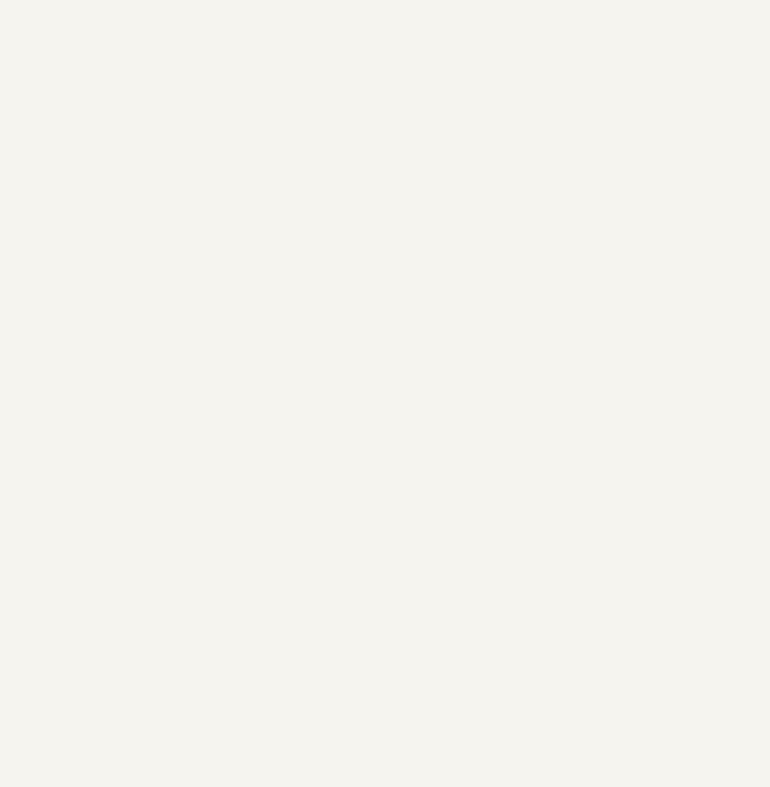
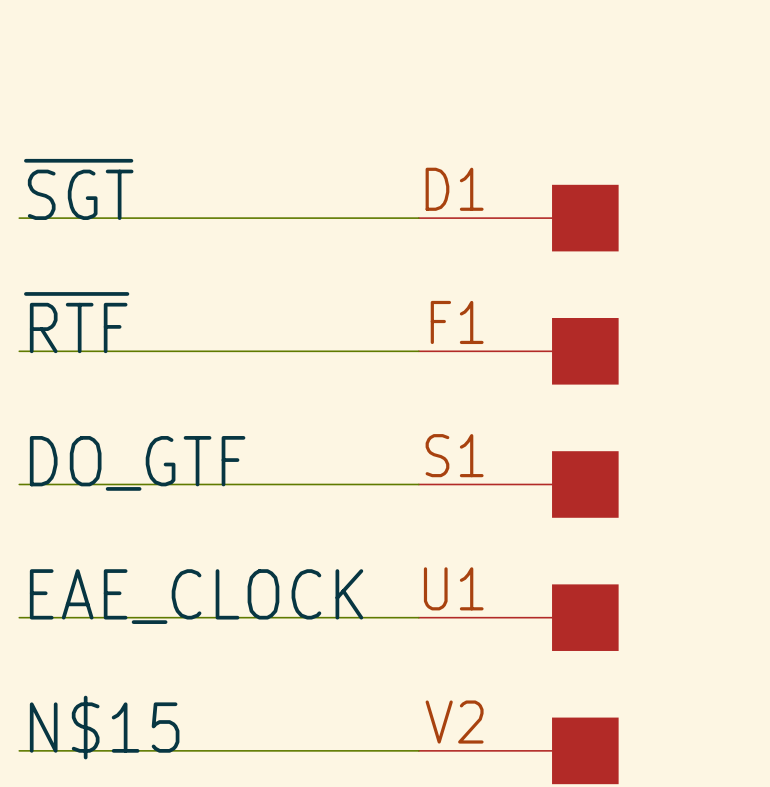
label: none -> ~{SGT} (78, 189)
wire: none -> (19, 218) (418, 218)
part: none -> (518, 218)
label: none -> ~{RTF} (76, 322)
wire: none -> (19, 351) (418, 351)
part: none -> (518, 351)
label: none -> DO_GTF (137, 463)
wire: none -> (19, 484) (418, 484)
part: none -> (518, 484)
label: none -> EAE_CLOCK (196, 596)
wire: none -> (19, 617) (418, 617)
part: none -> (518, 617)
label: none -> N$15 (104, 727)
wire: none -> (19, 750) (418, 750)
part: none -> (518, 750)

